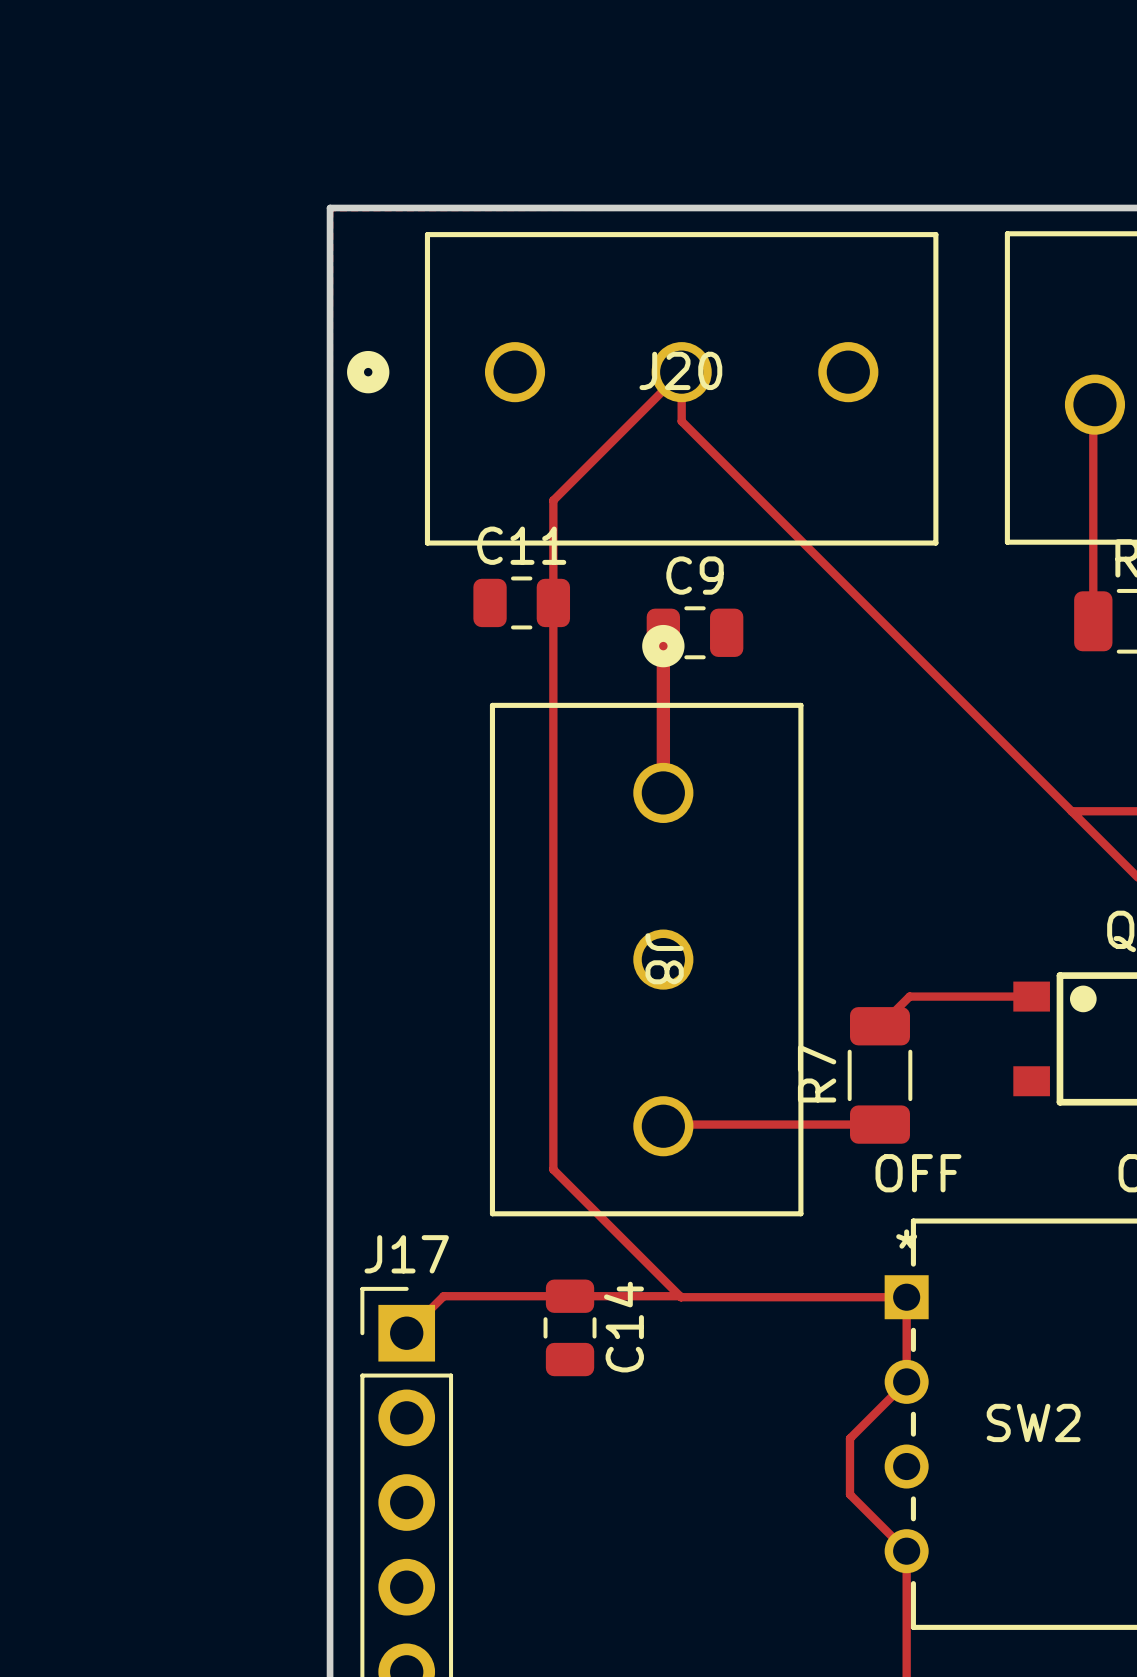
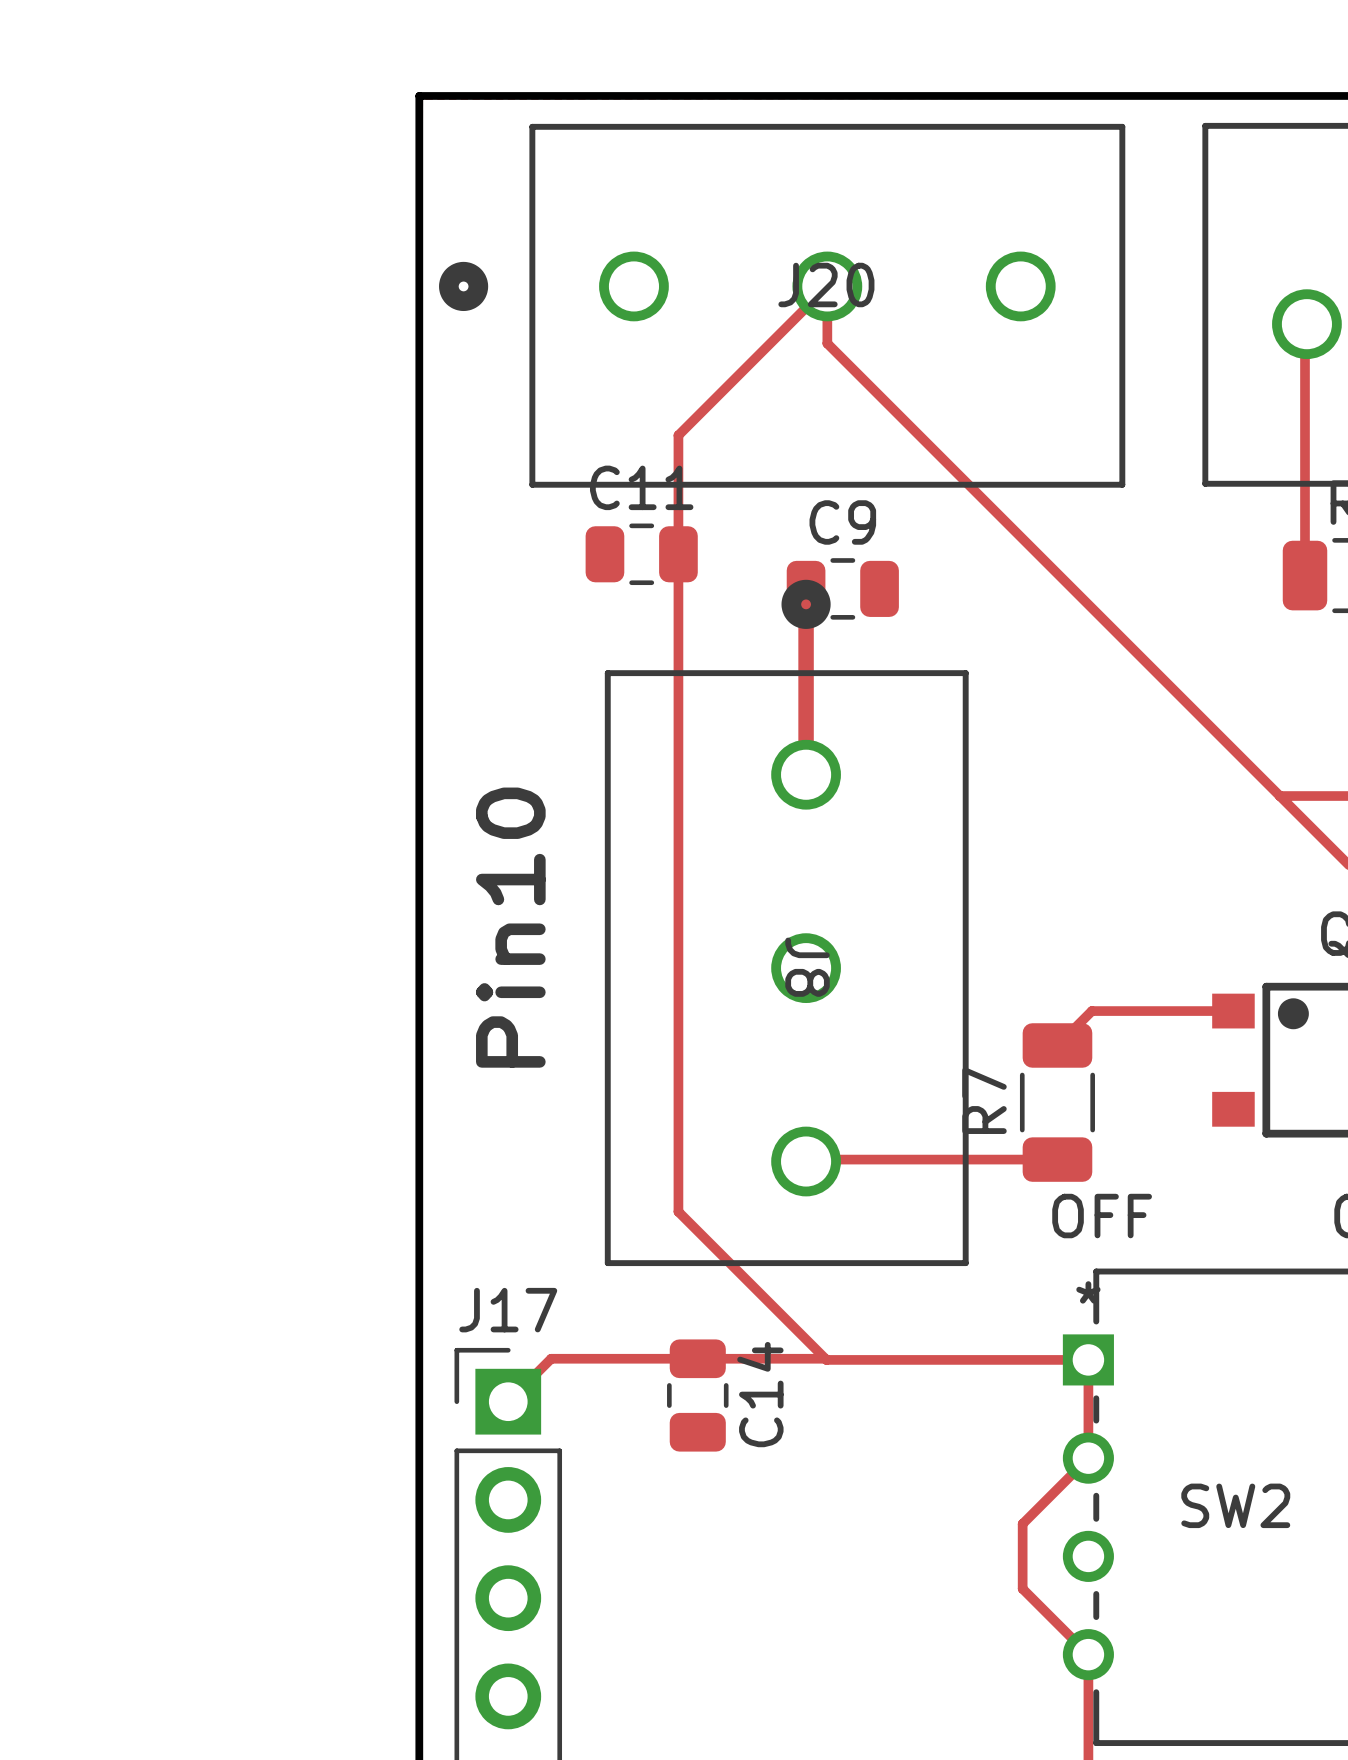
text: none -> Pin10 (510, 927)

